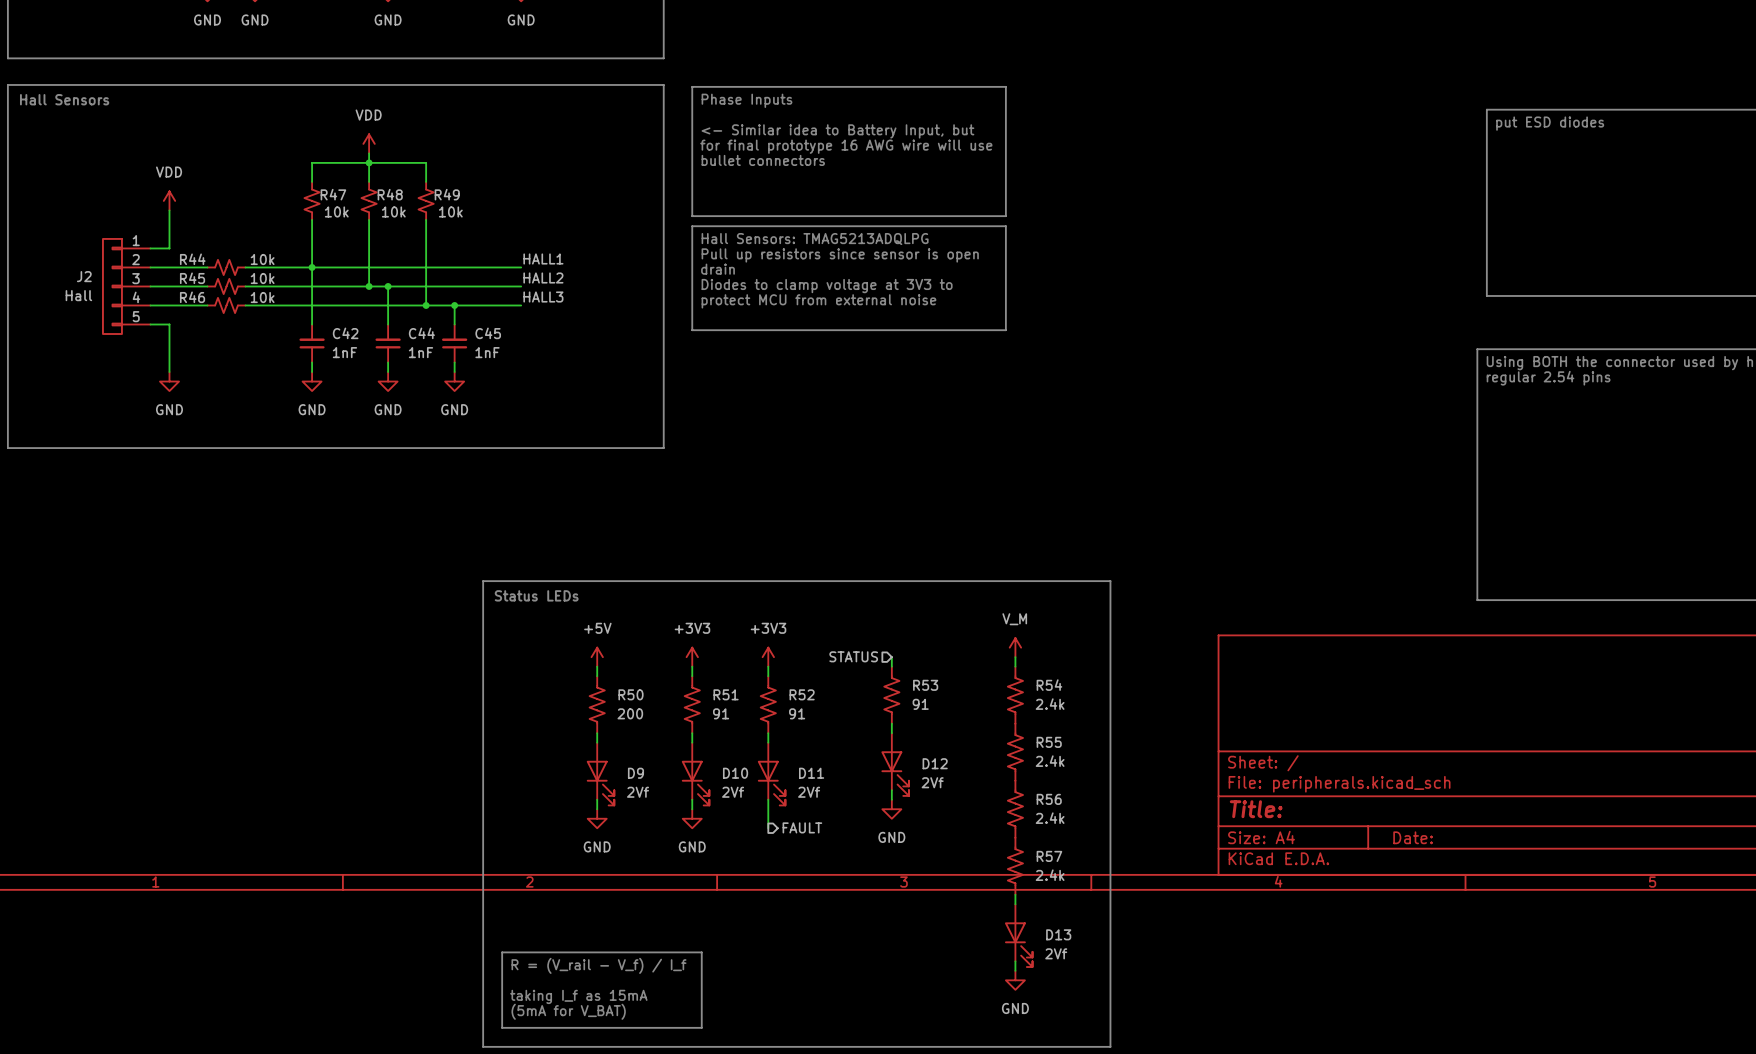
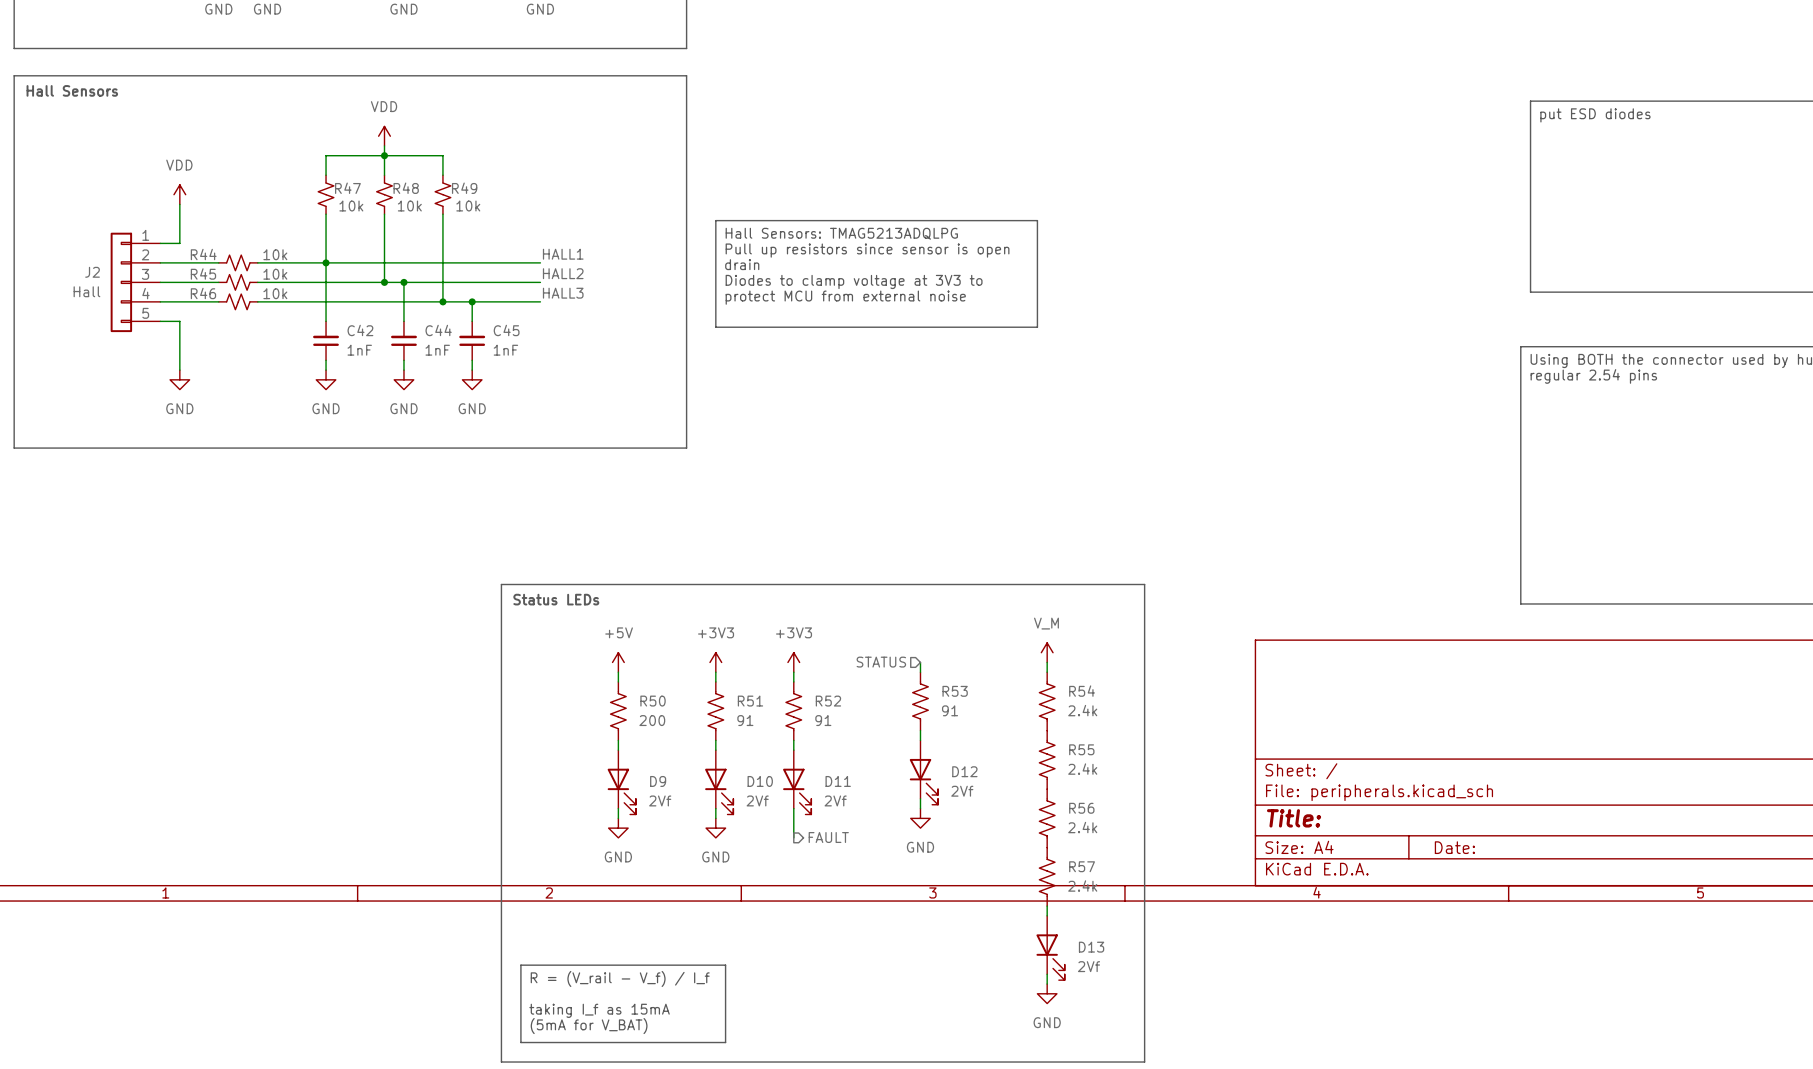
line: (692, 86) (1005, 86) (1005, 216) (692, 216) (692, 86) -> none
text: Phase Inputs (746, 100) -> none
text: <- Similar idea to Battery Input, but (837, 131) -> none
text: for final prototype 16 AWG wire will use (846, 146) -> none
text: bullet connectors (763, 160) -> none

